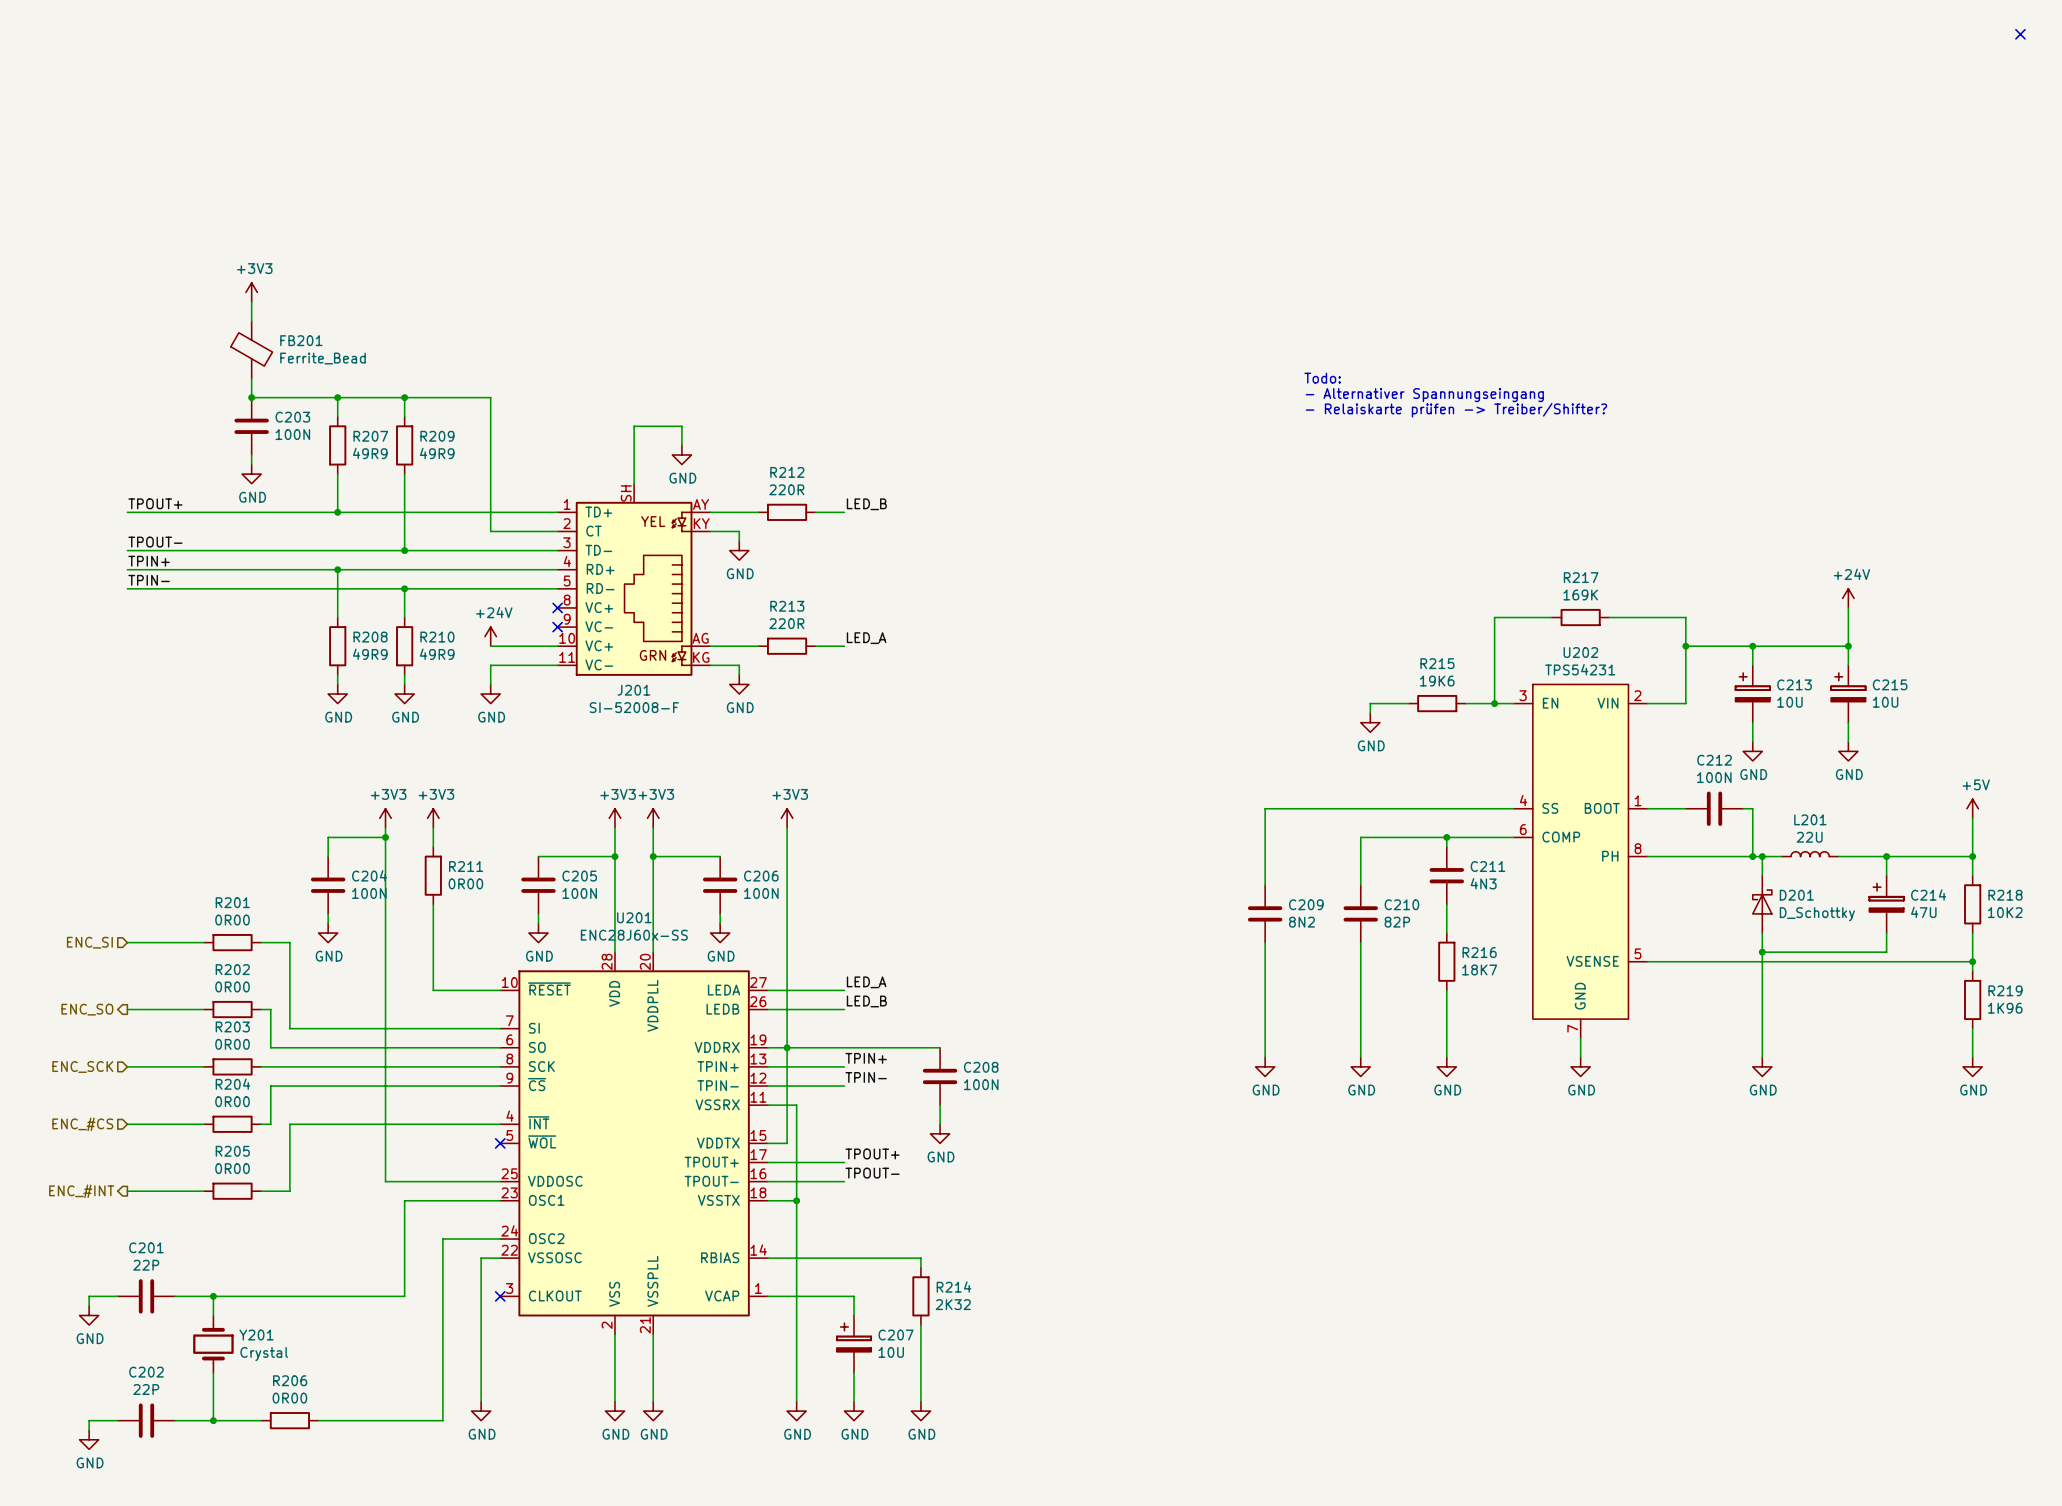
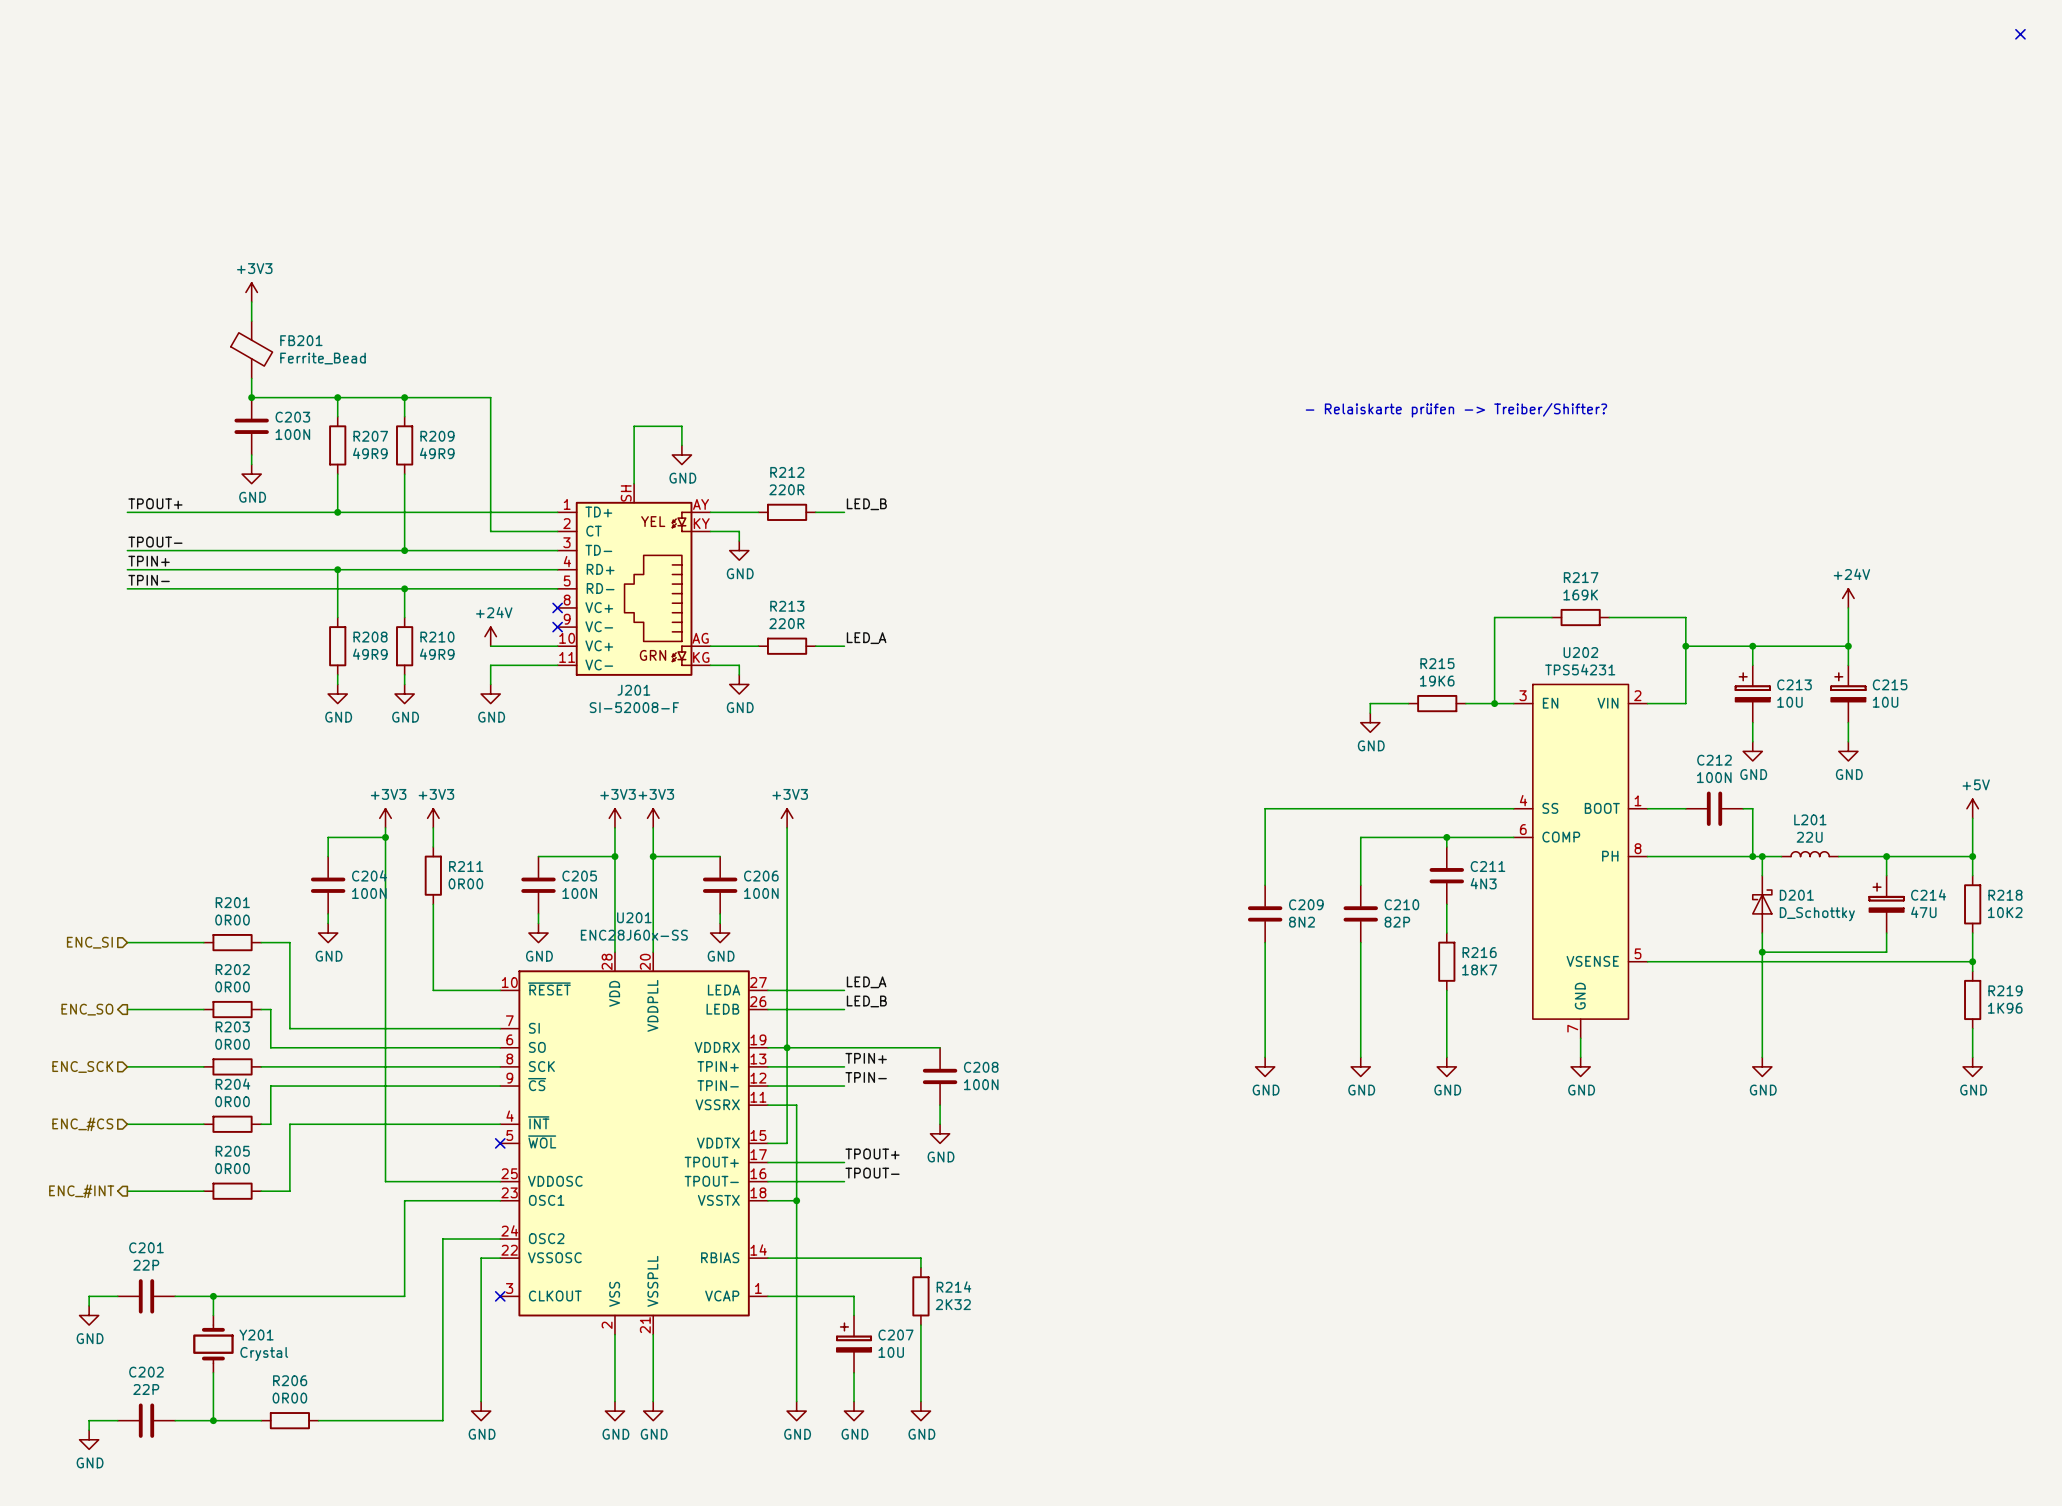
text: Todo: (1322, 378) -> none
text: - Alternativer Spannungseingang (1424, 395) -> none

